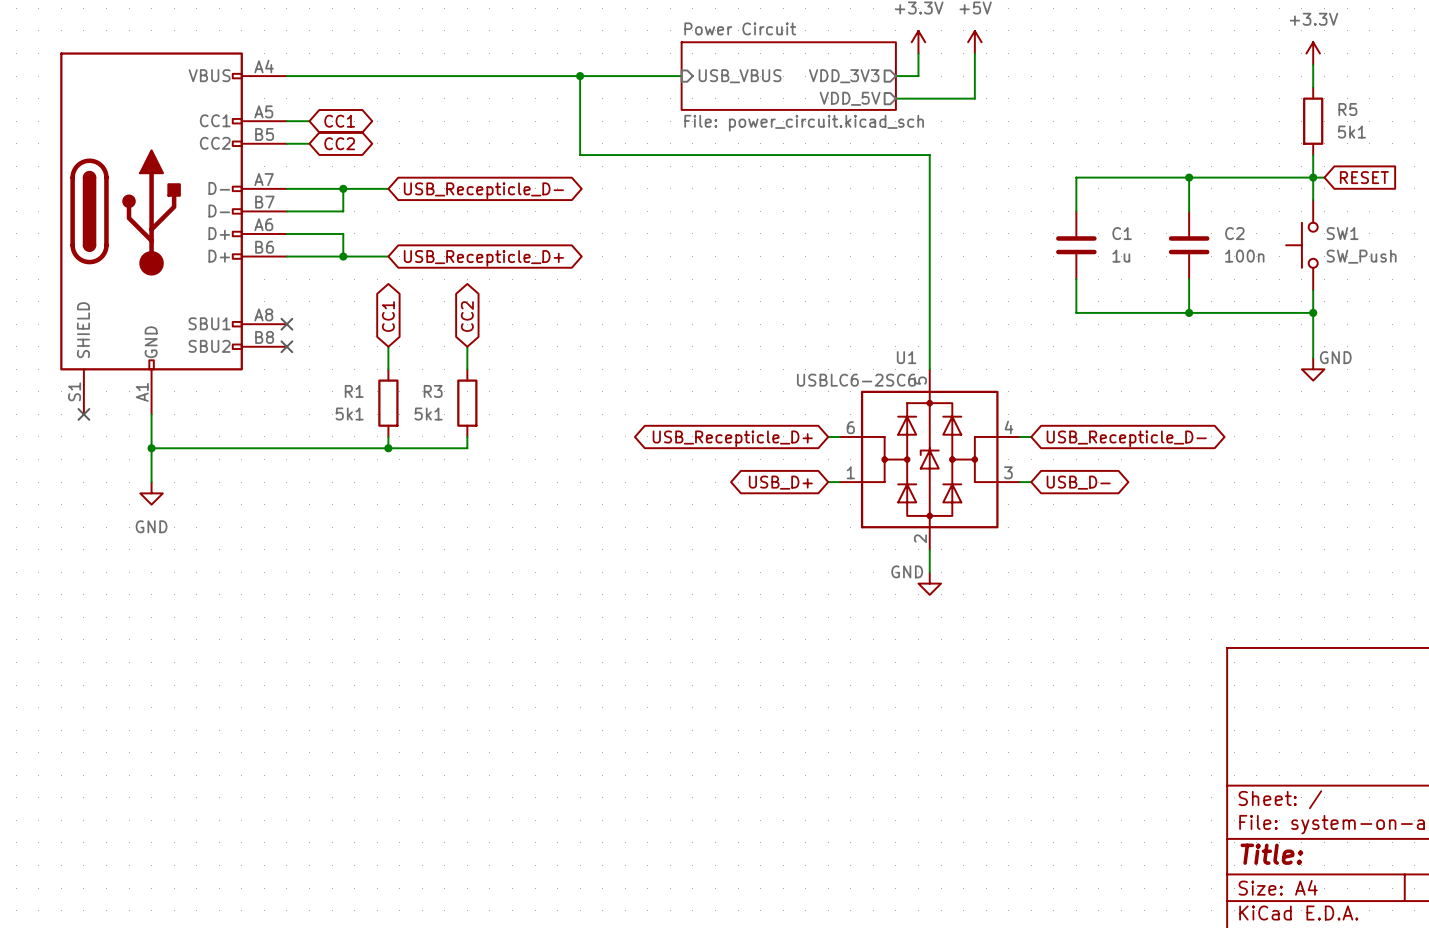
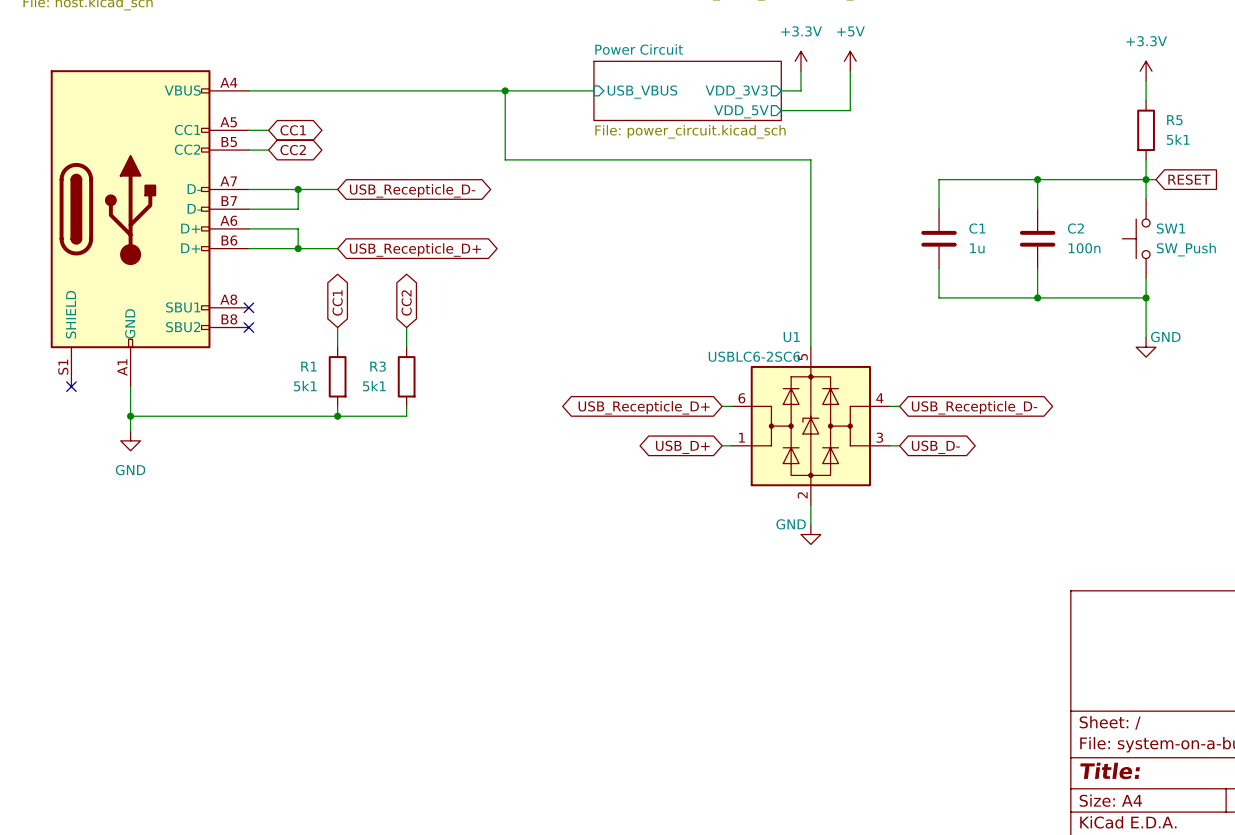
power symbol position: GND (151, 493) -> GND (130, 440)

